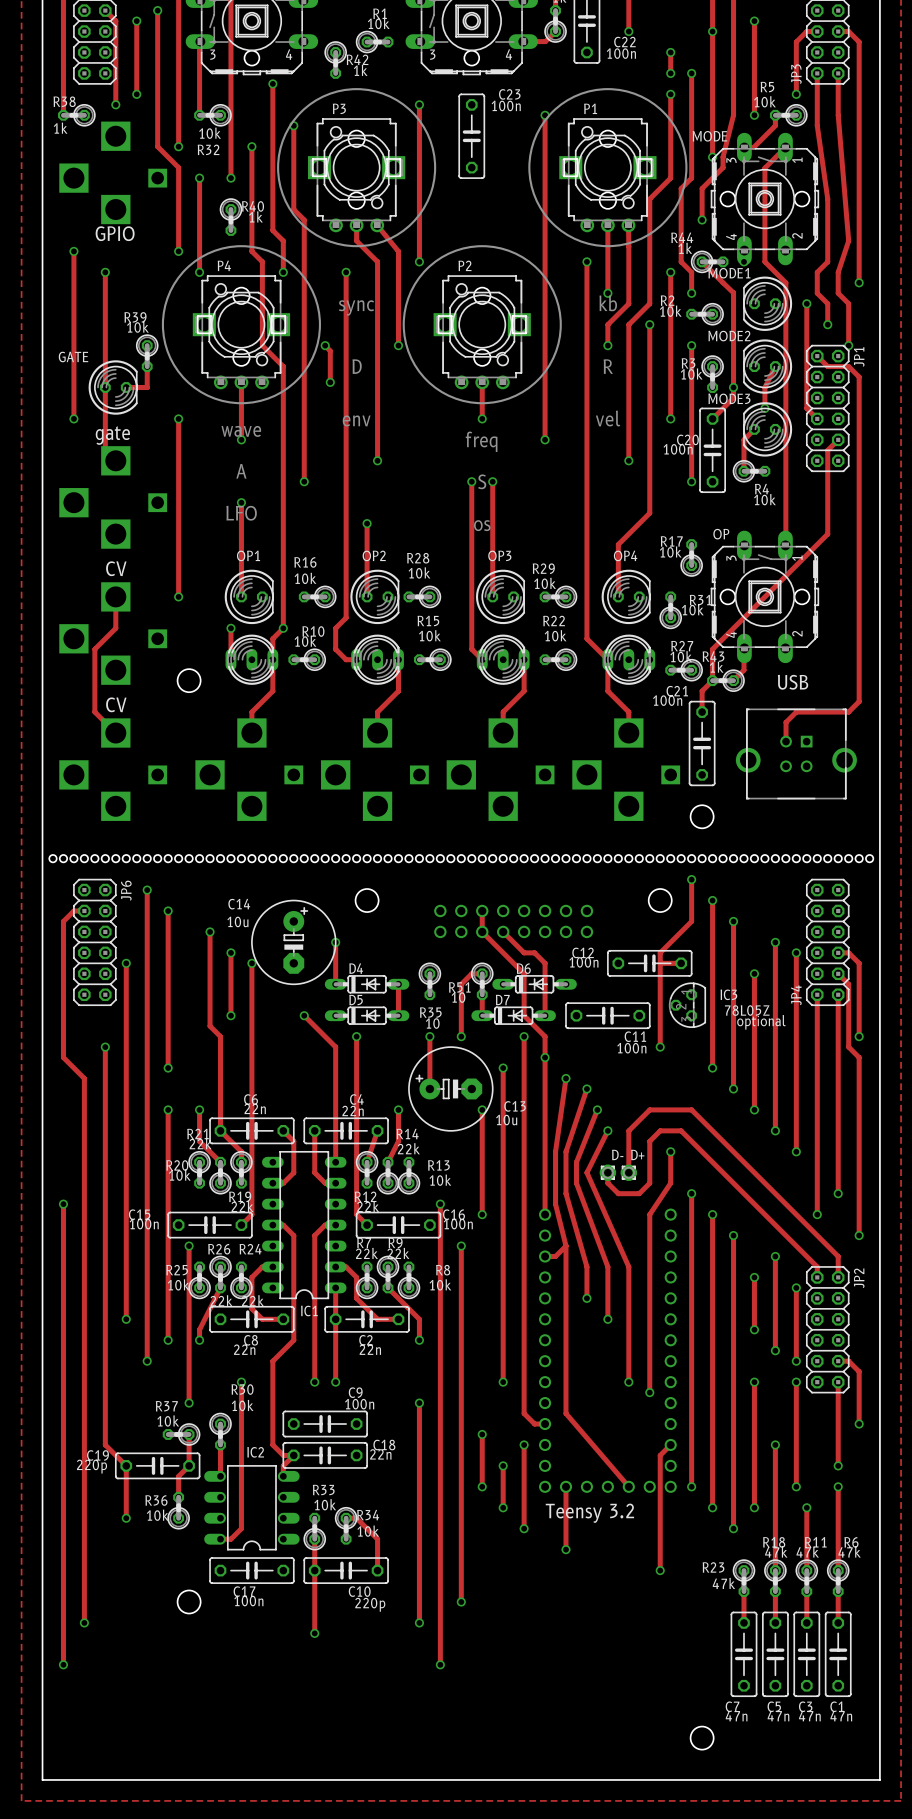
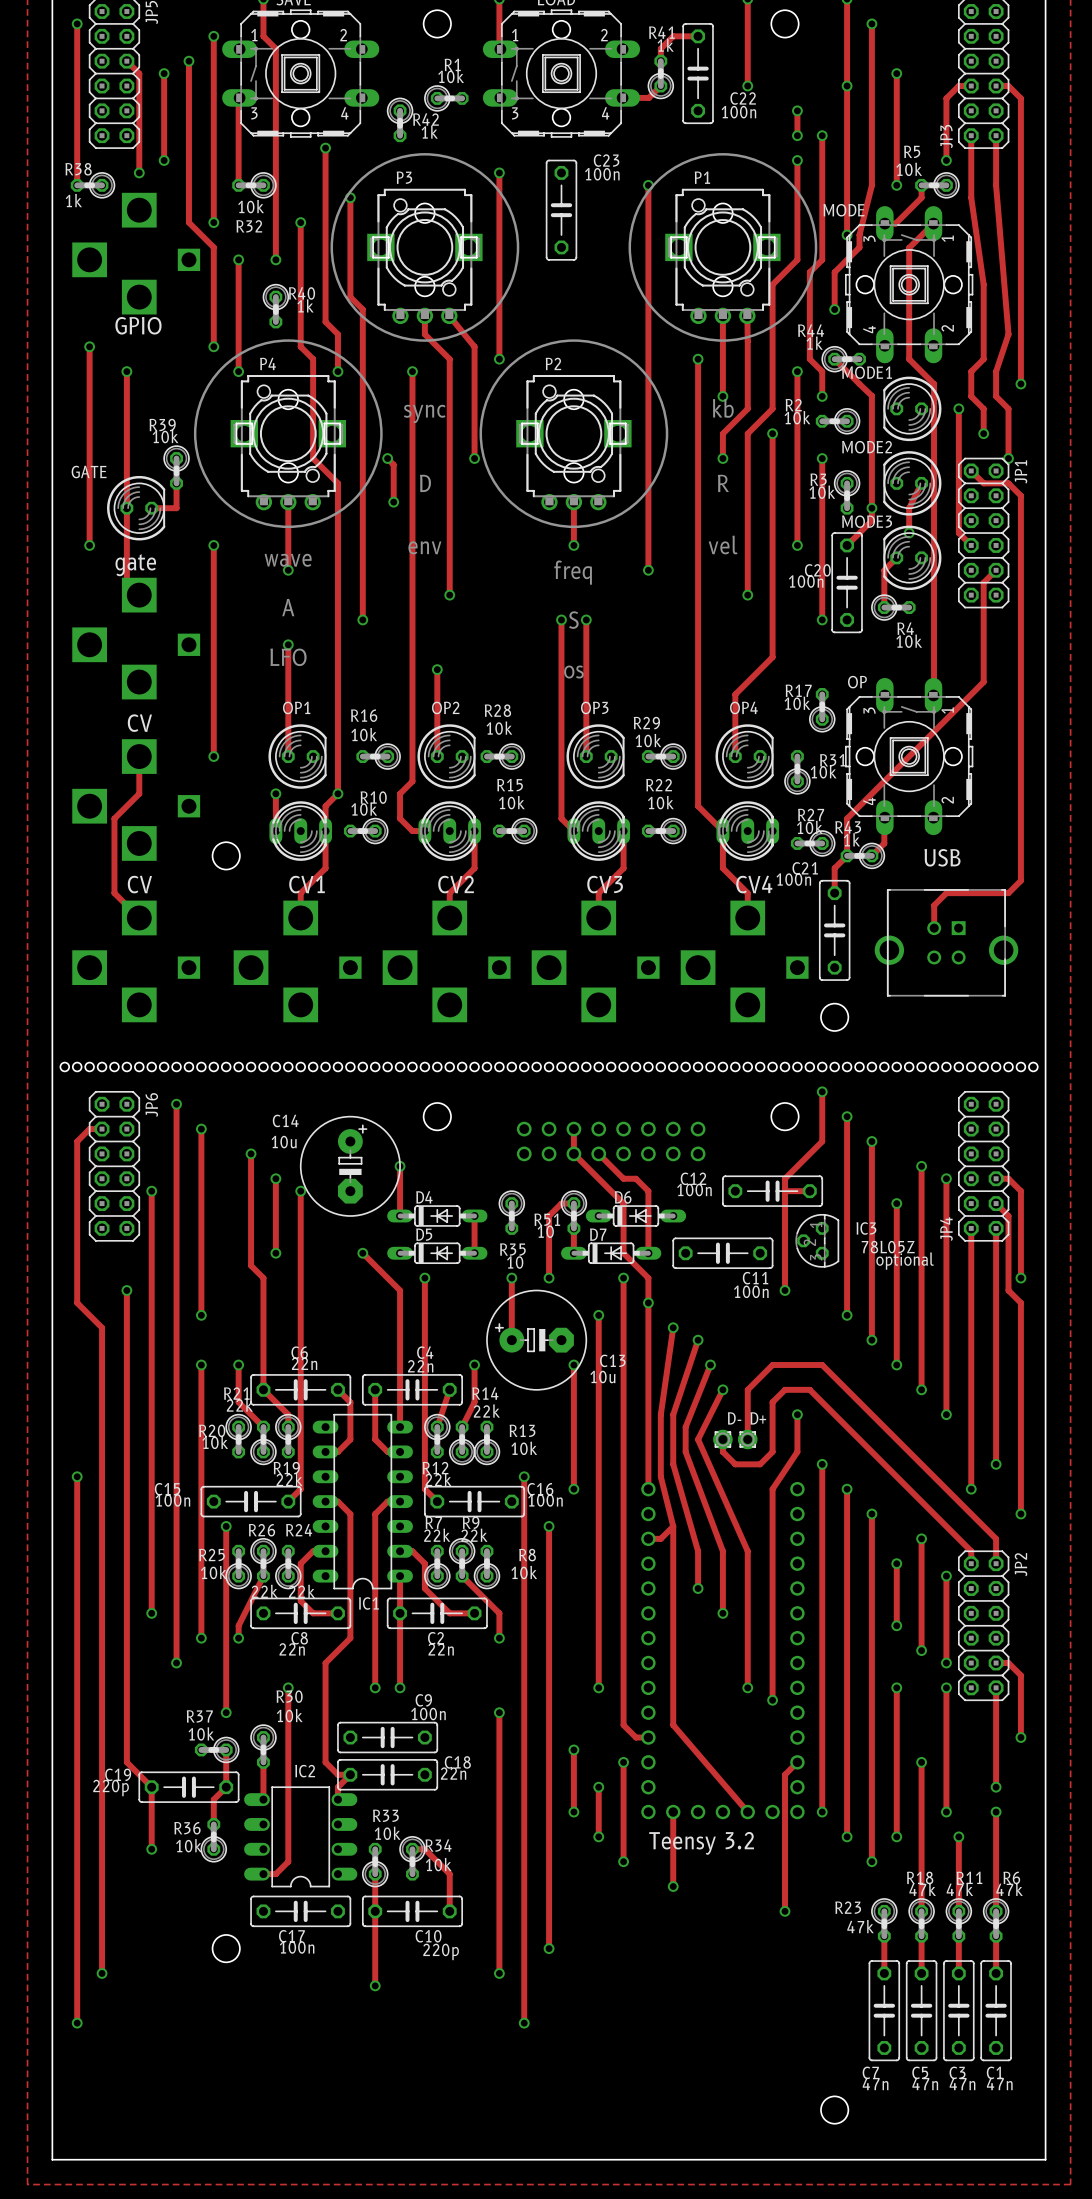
via: (743, 261) -> none
text: none -> CV1 (307, 884)
text: none -> CV2 (456, 884)
text: none -> CV3 (605, 884)
text: none -> CV4 (754, 884)

